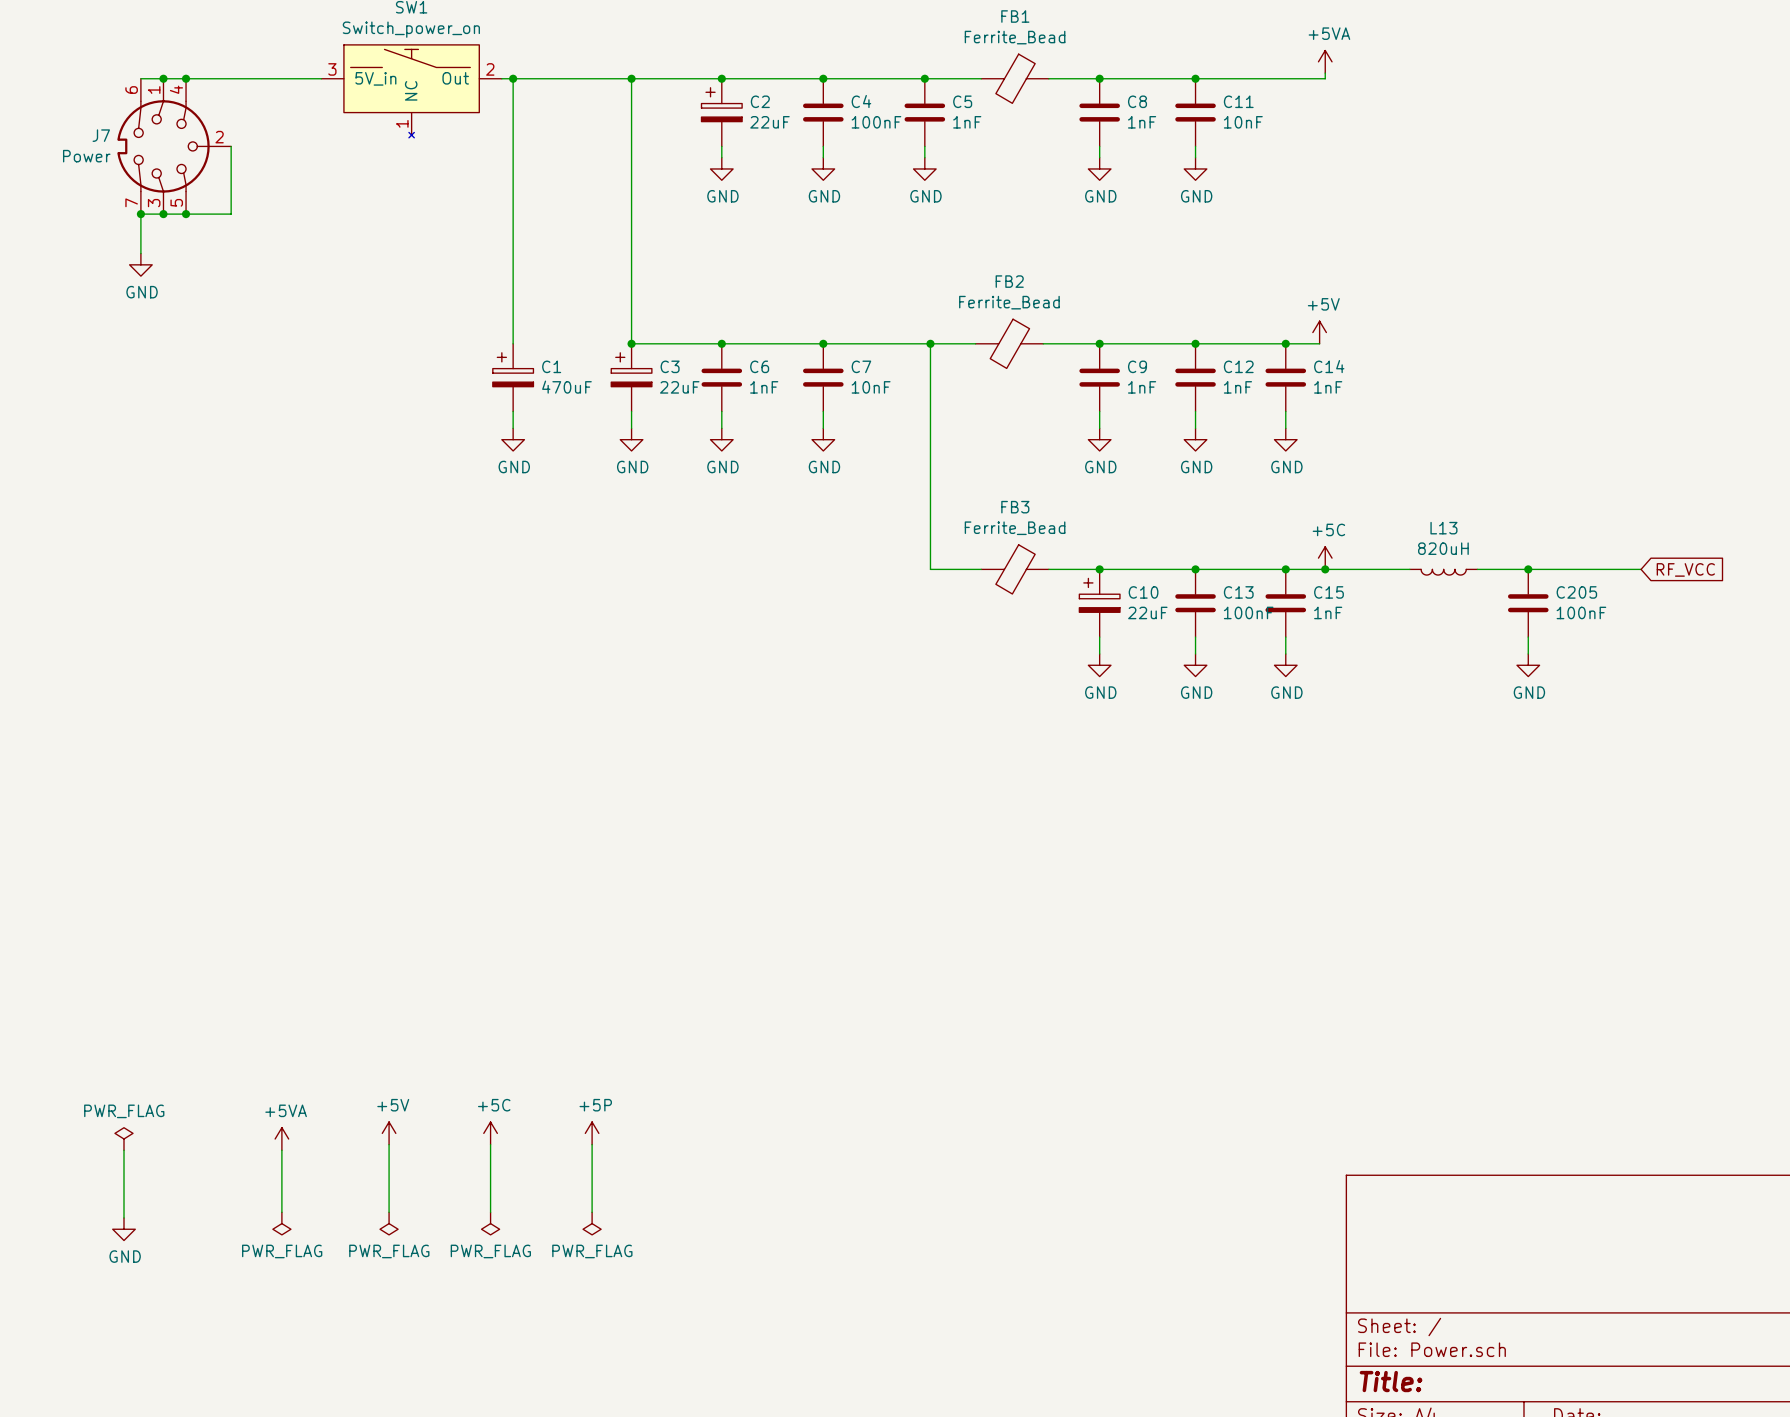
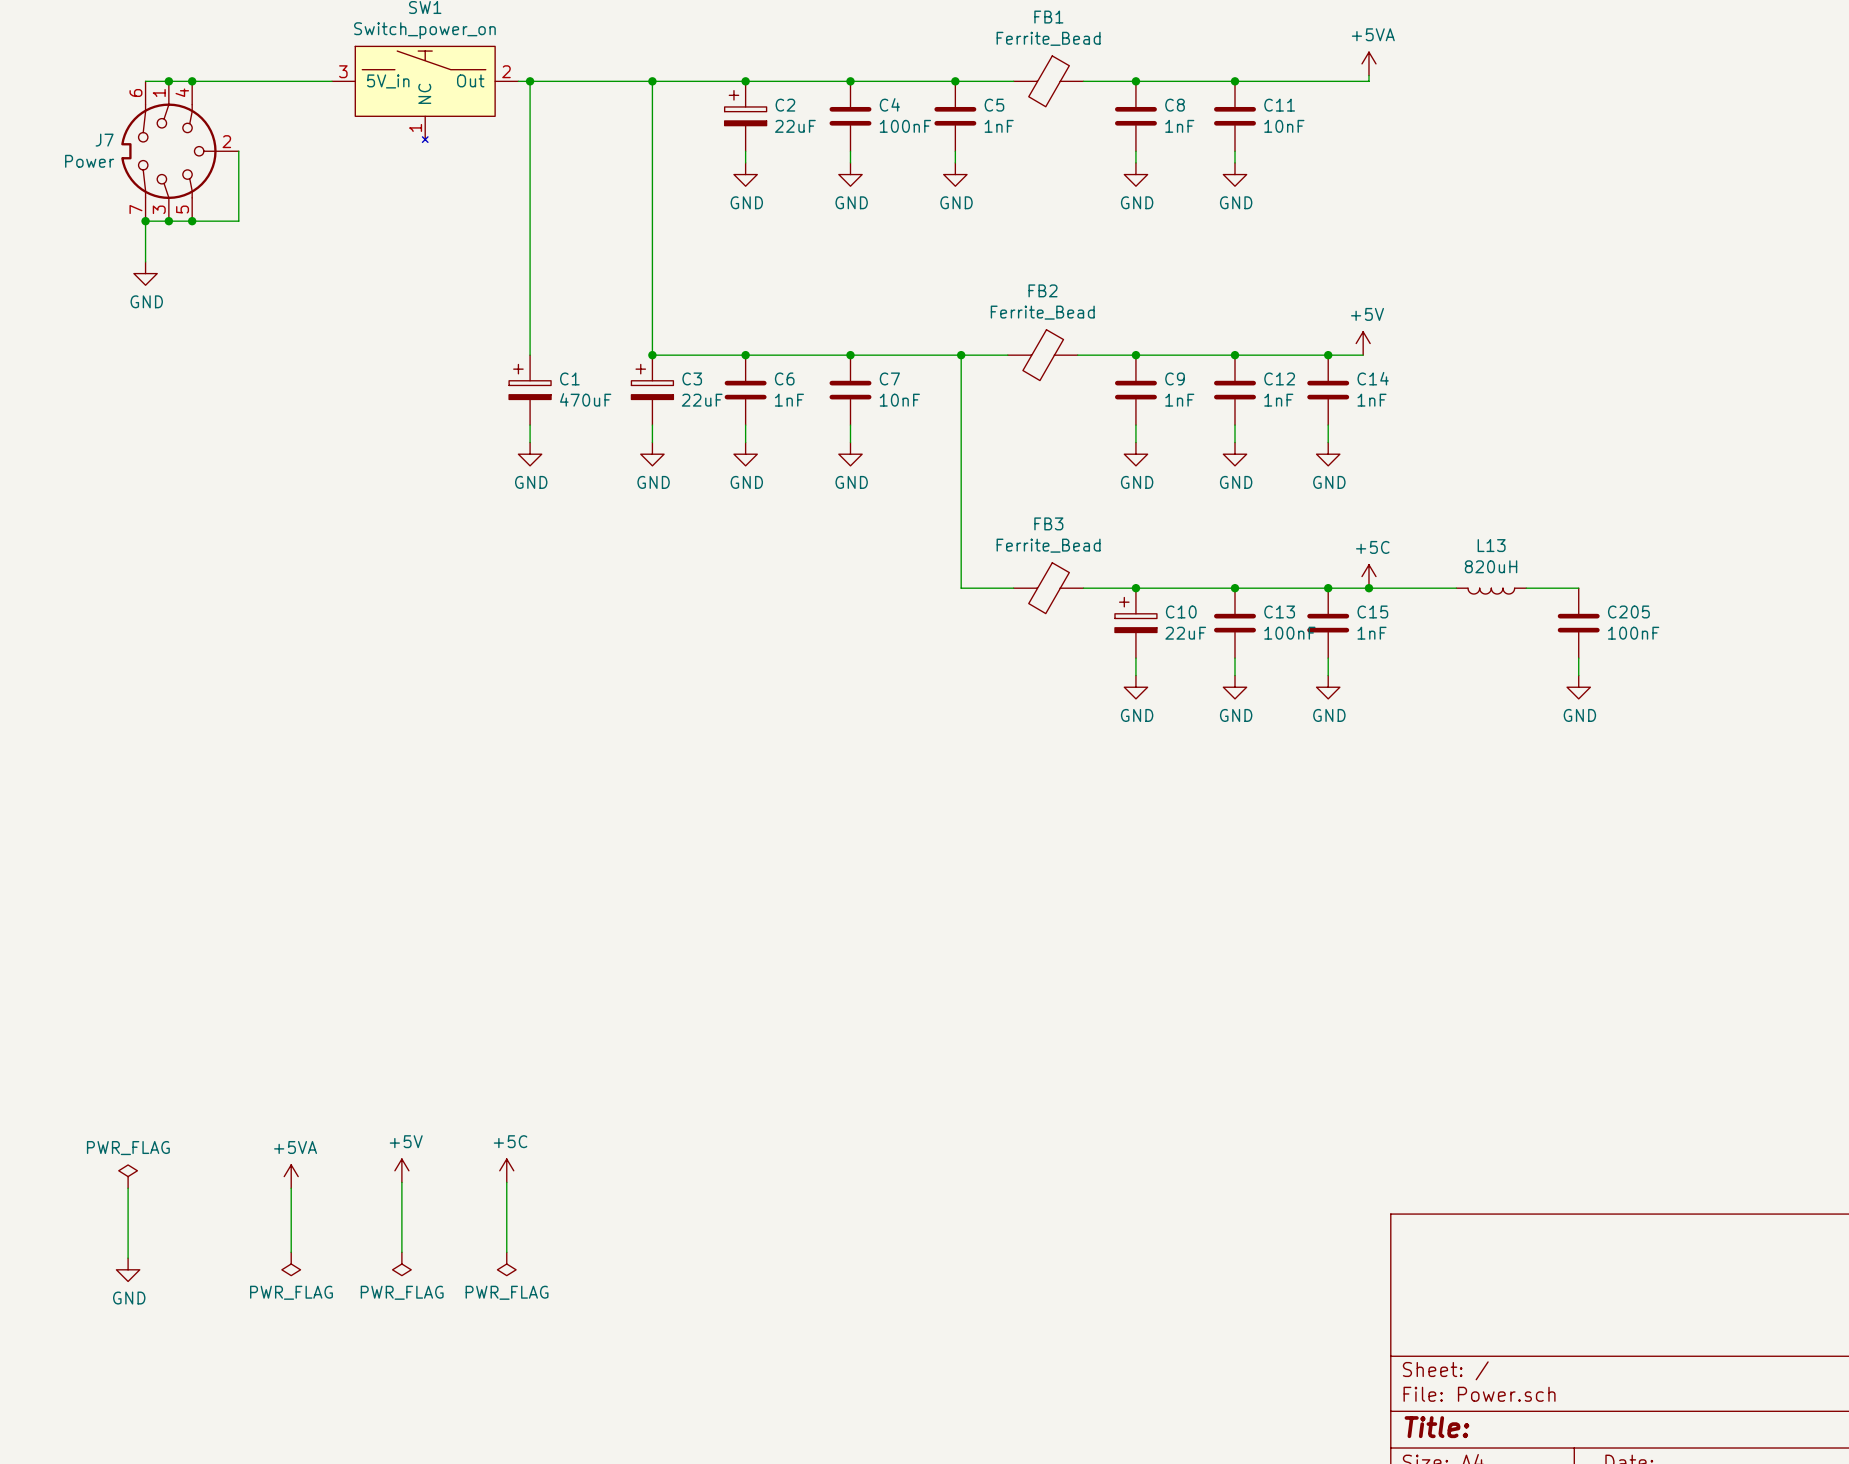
wire: (1528, 569) (1641, 569) -> none
junction: (1528, 569) -> none
global label: RF_VCC (1685, 569) -> none
power symbol: +5P (592, 1133) -> none
wire: (592, 1144) (592, 1212) -> none
power symbol: PWR_FLAG (592, 1223) -> none

